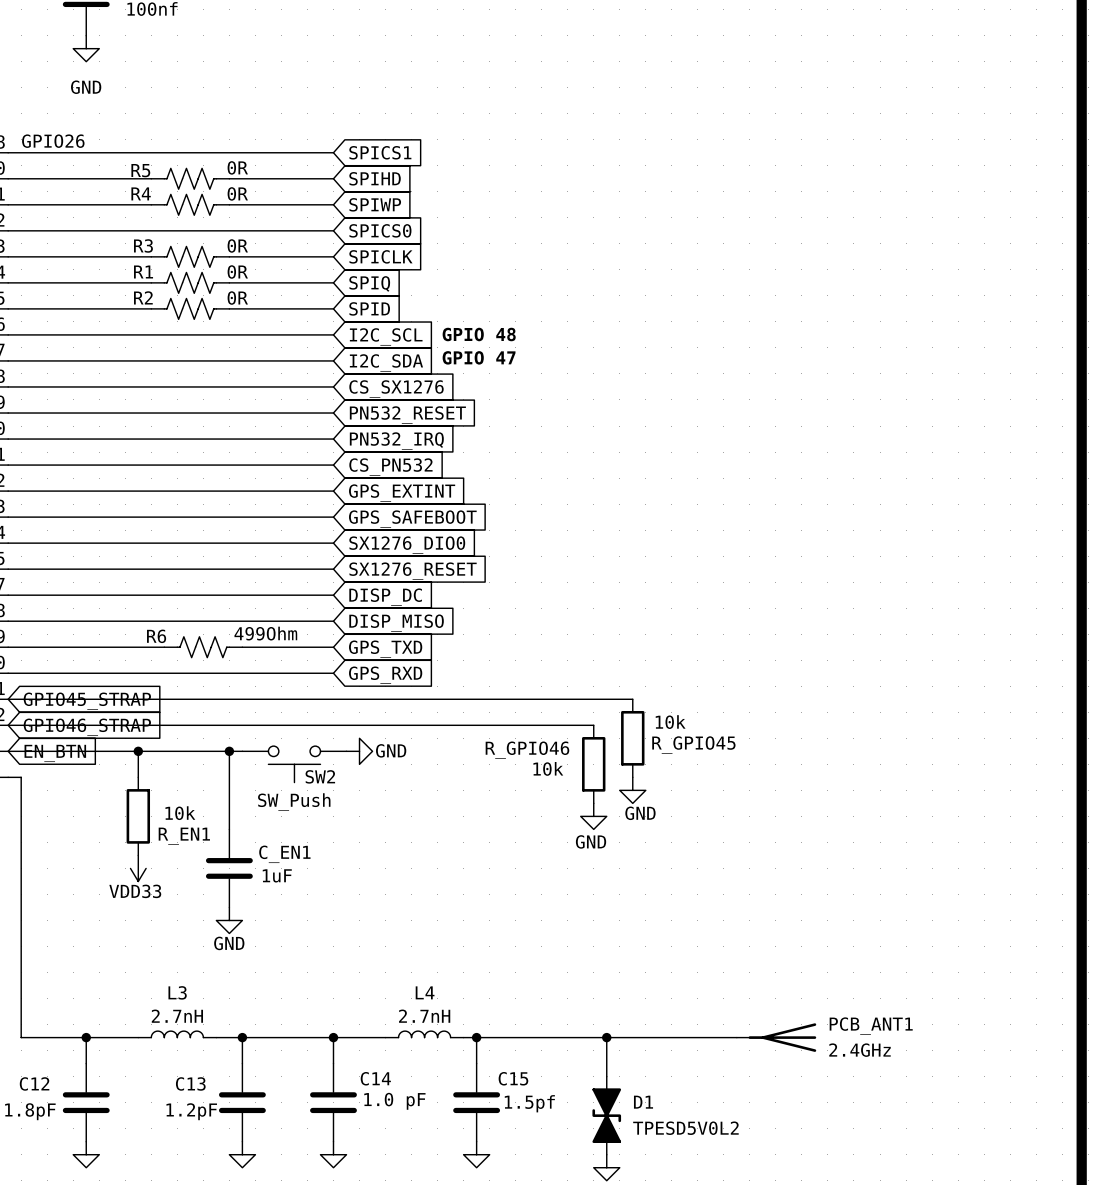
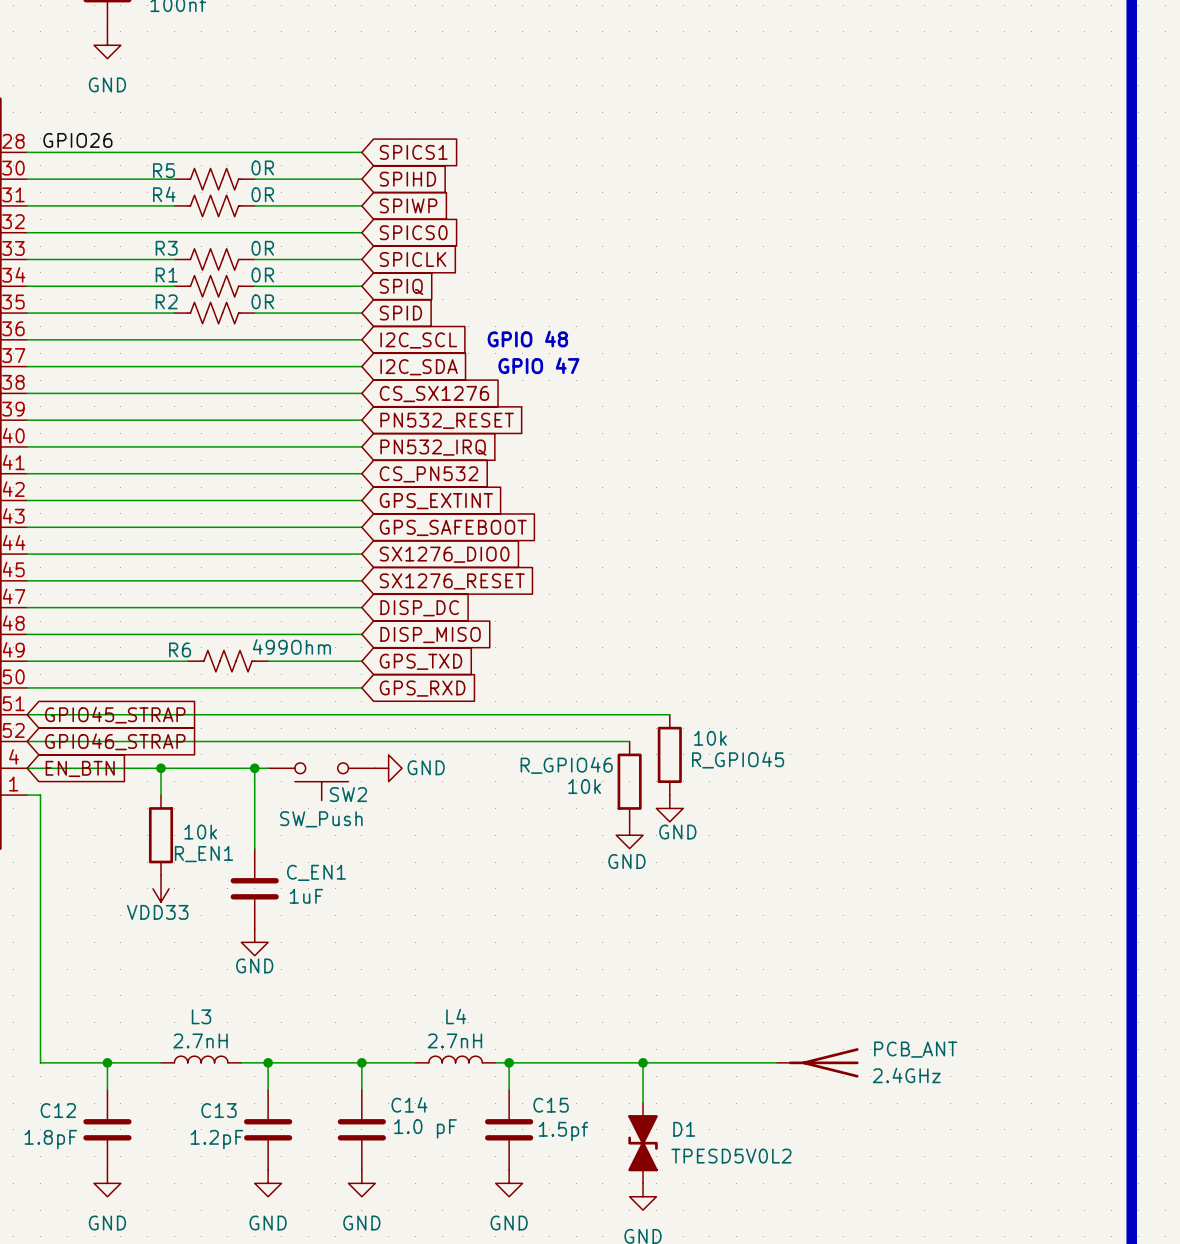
text position: GPIO 48 (479, 334) -> GPIO 48 (527, 339)
text position: GPIO 47 (479, 357) -> GPIO 47 (538, 365)
PCB_ANT1 name: PCB_ANT1 (871, 1026) -> PCB_ANT (915, 1049)

